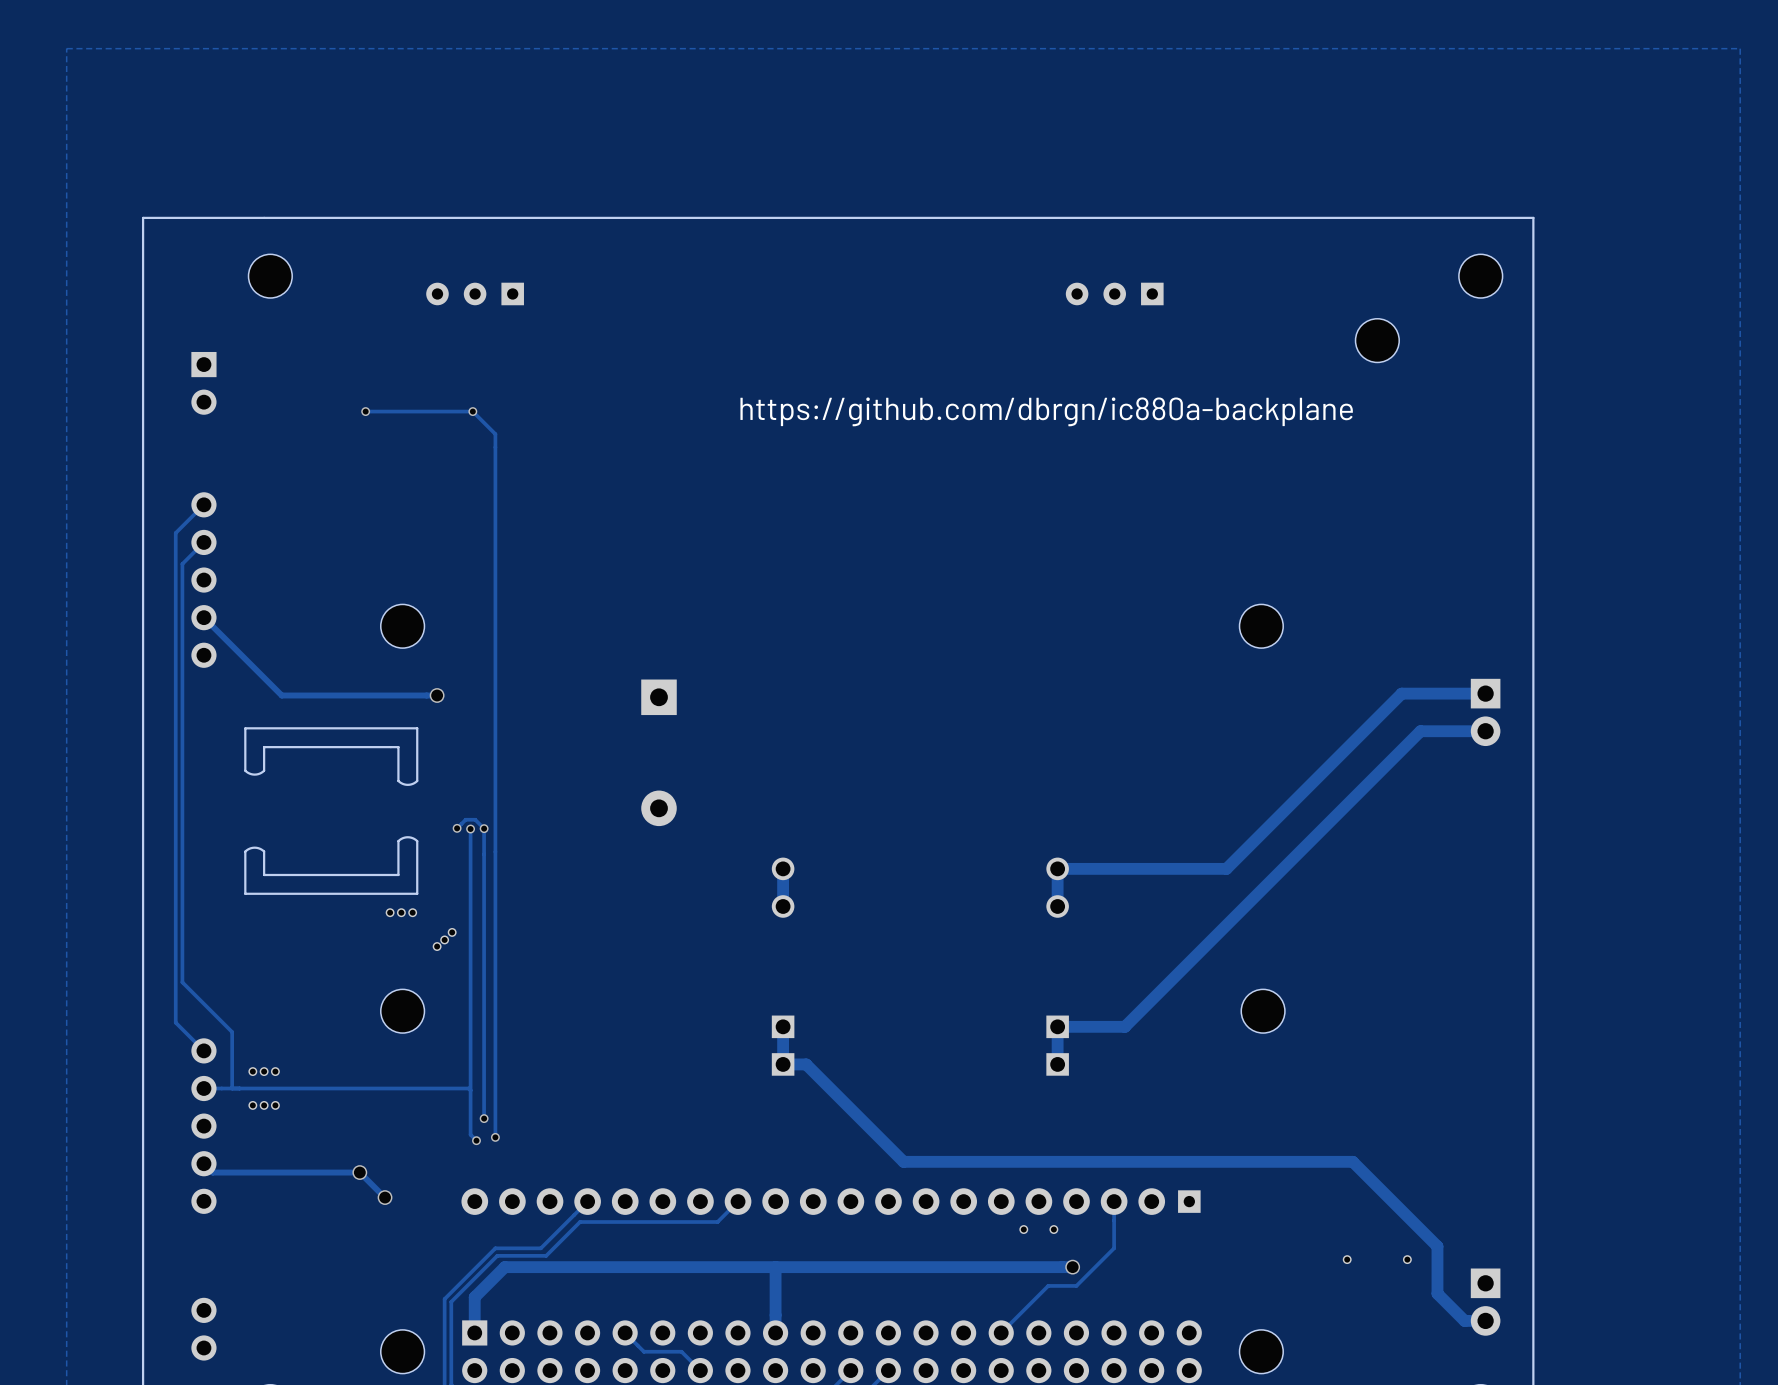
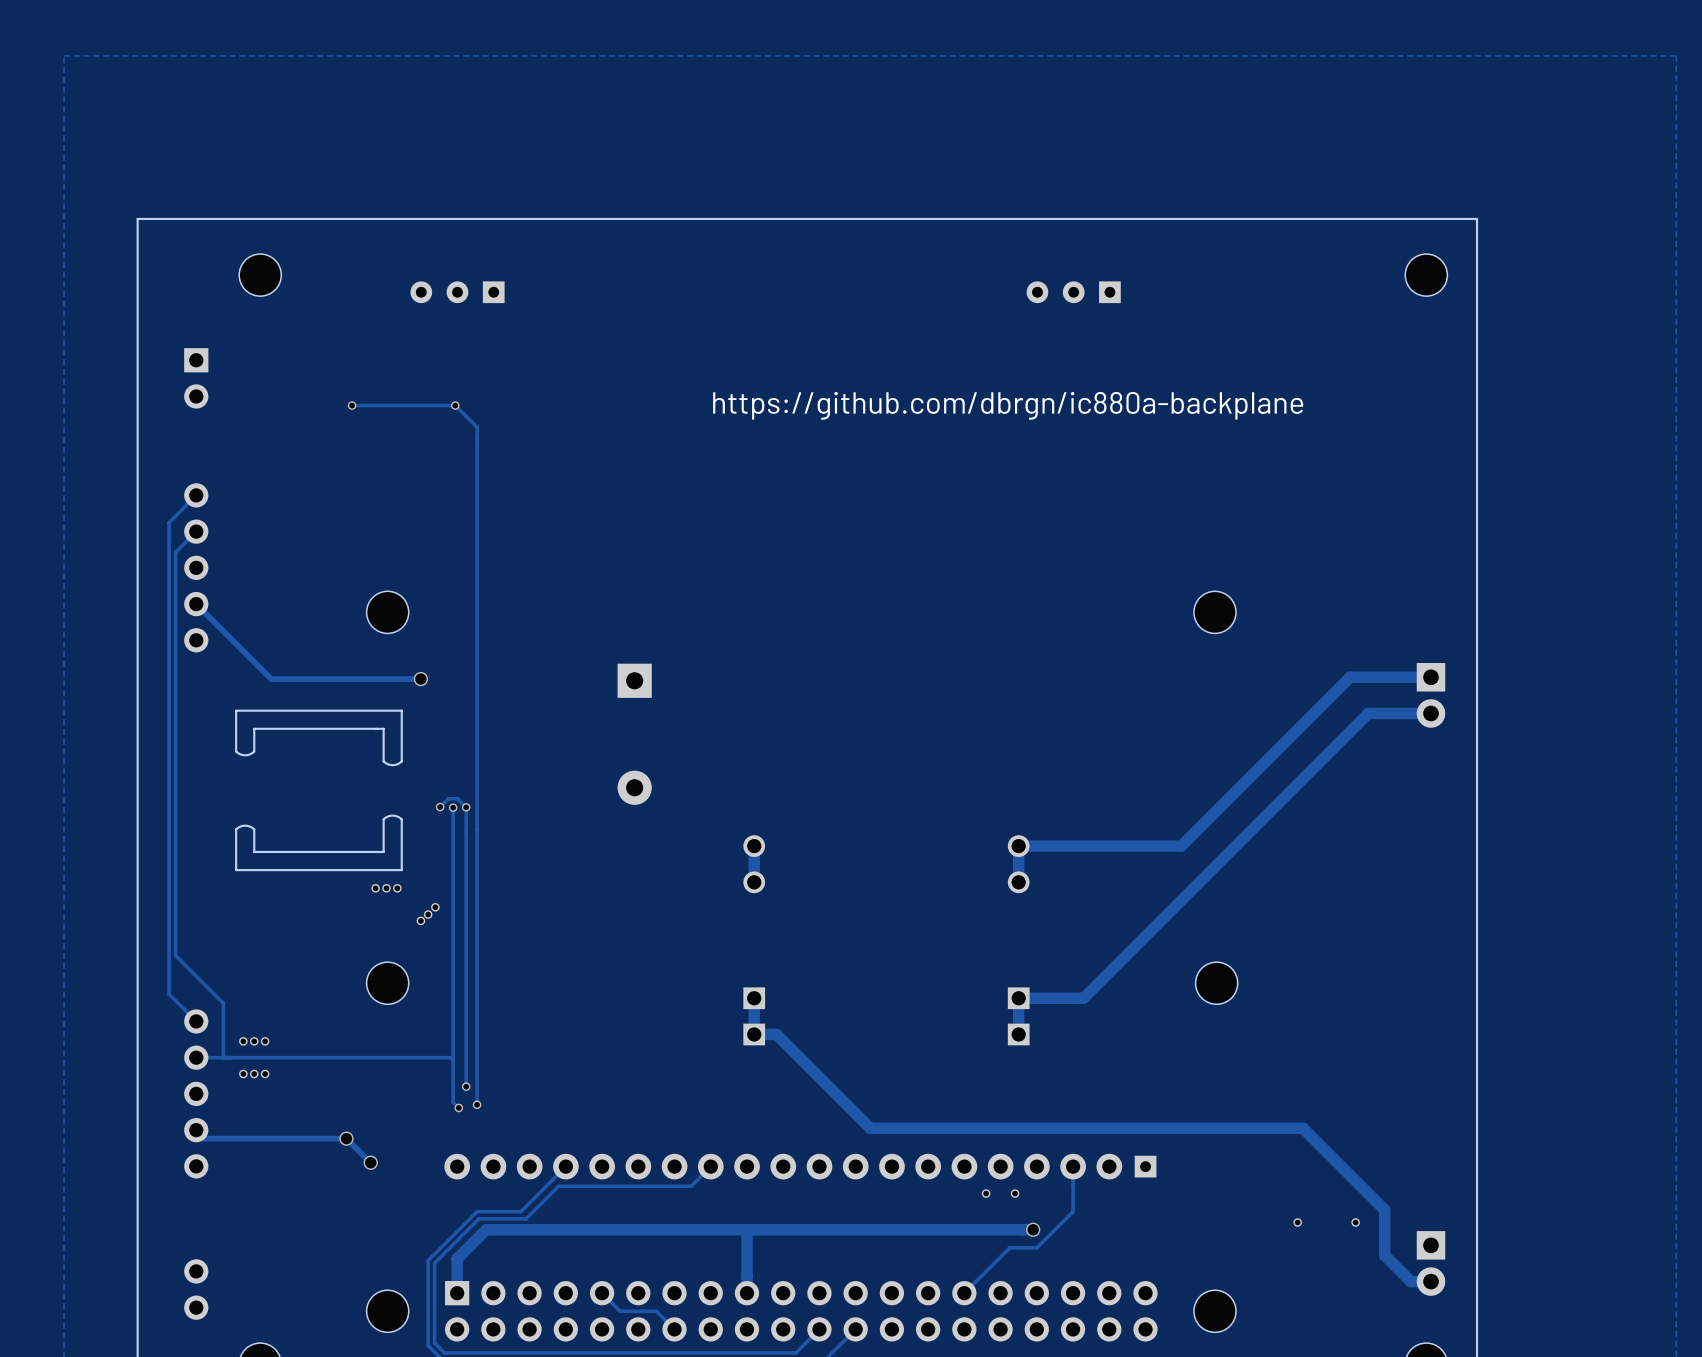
part: (1377, 340) -> none

